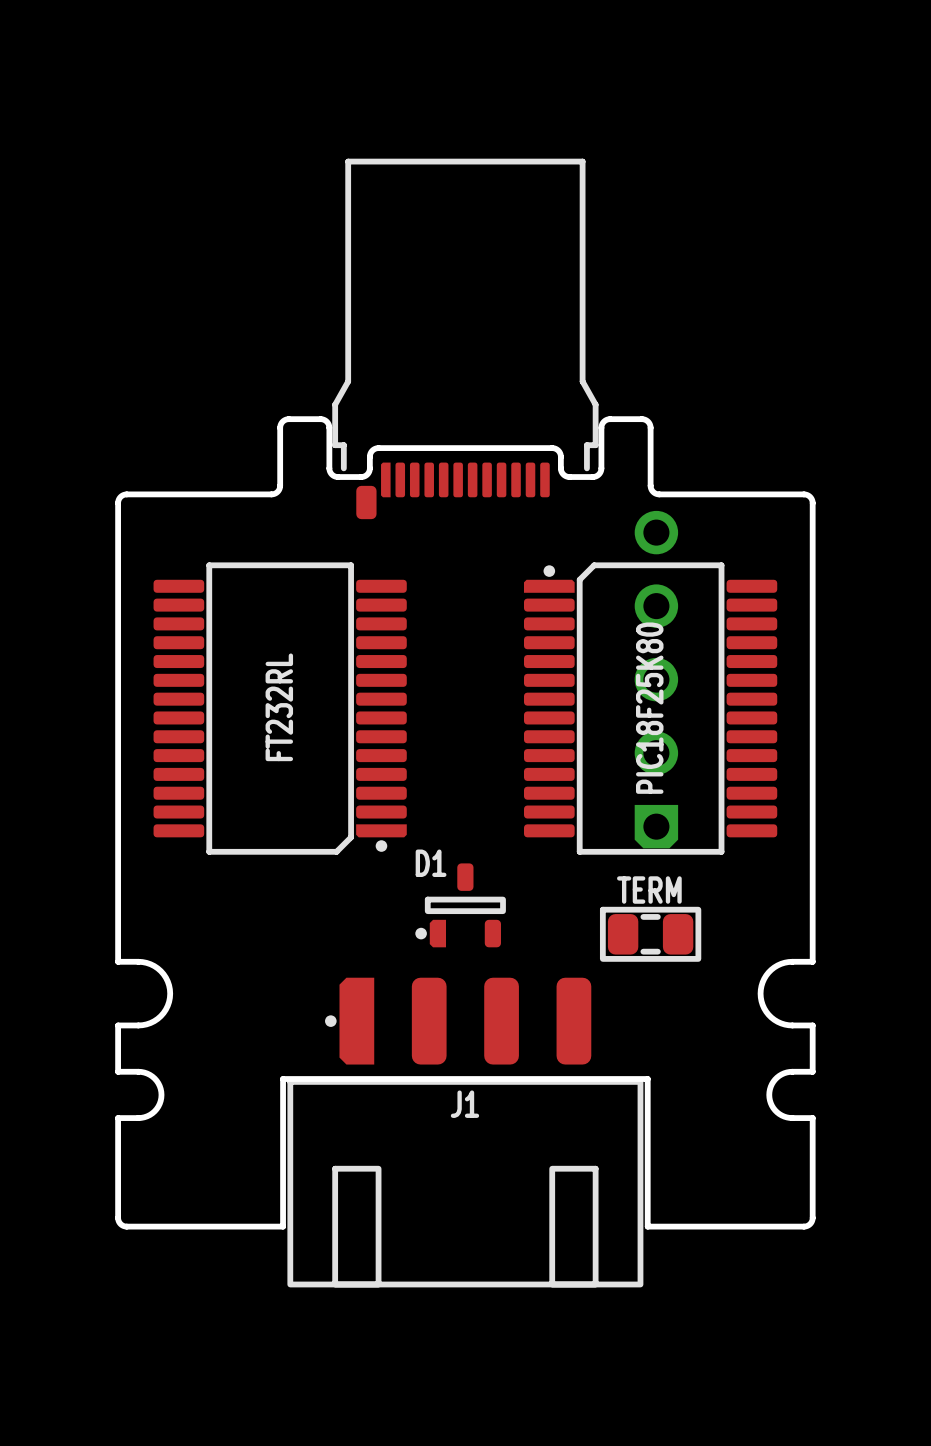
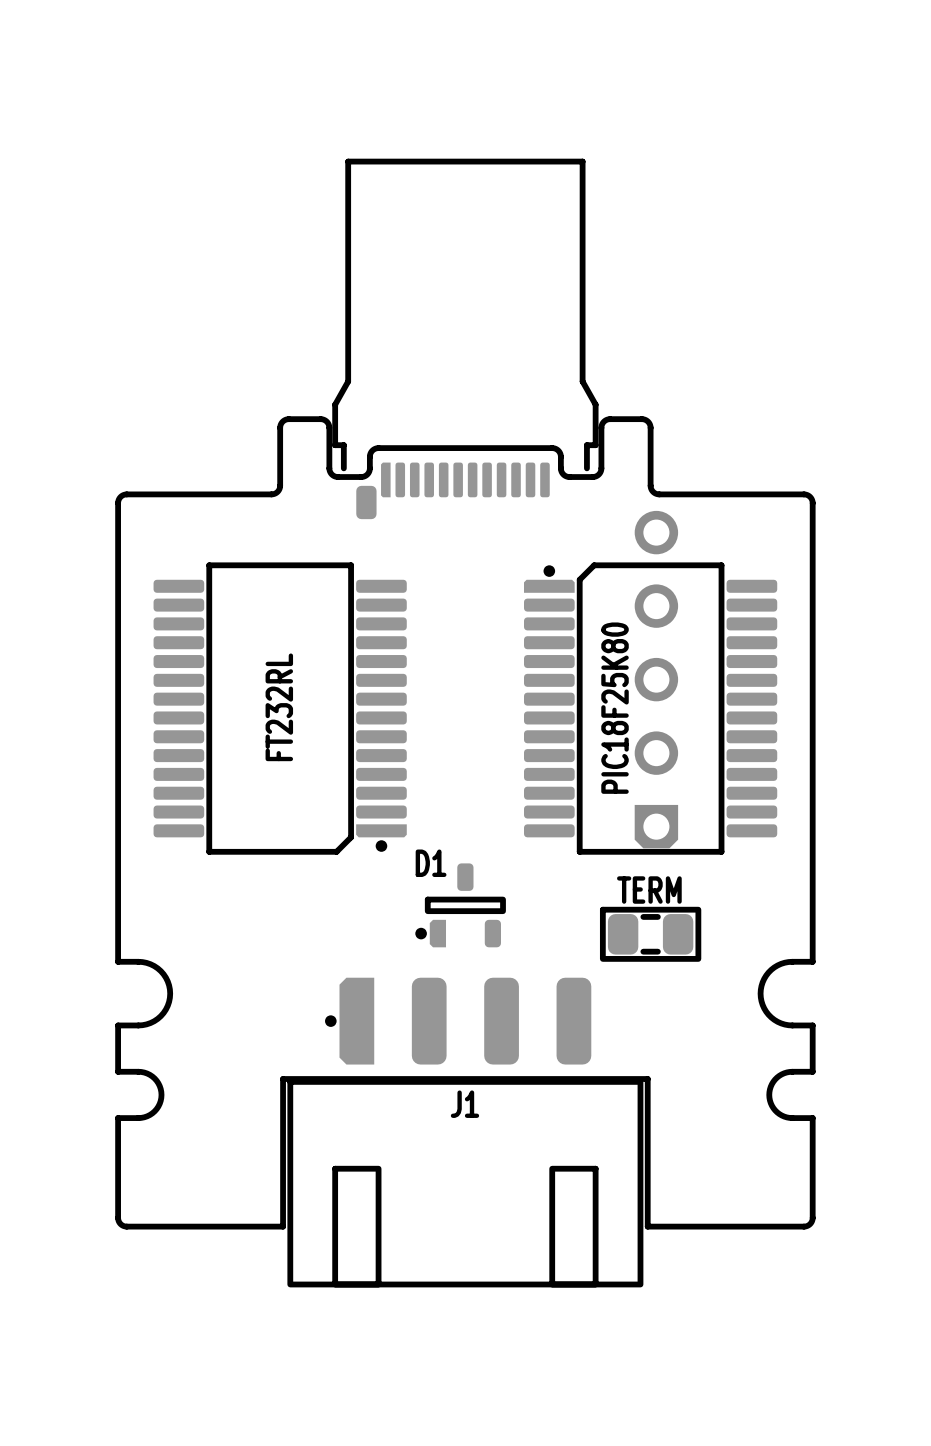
part value position: PIC18F25K80 (649, 708) -> PIC18F25K80 (615, 708)

